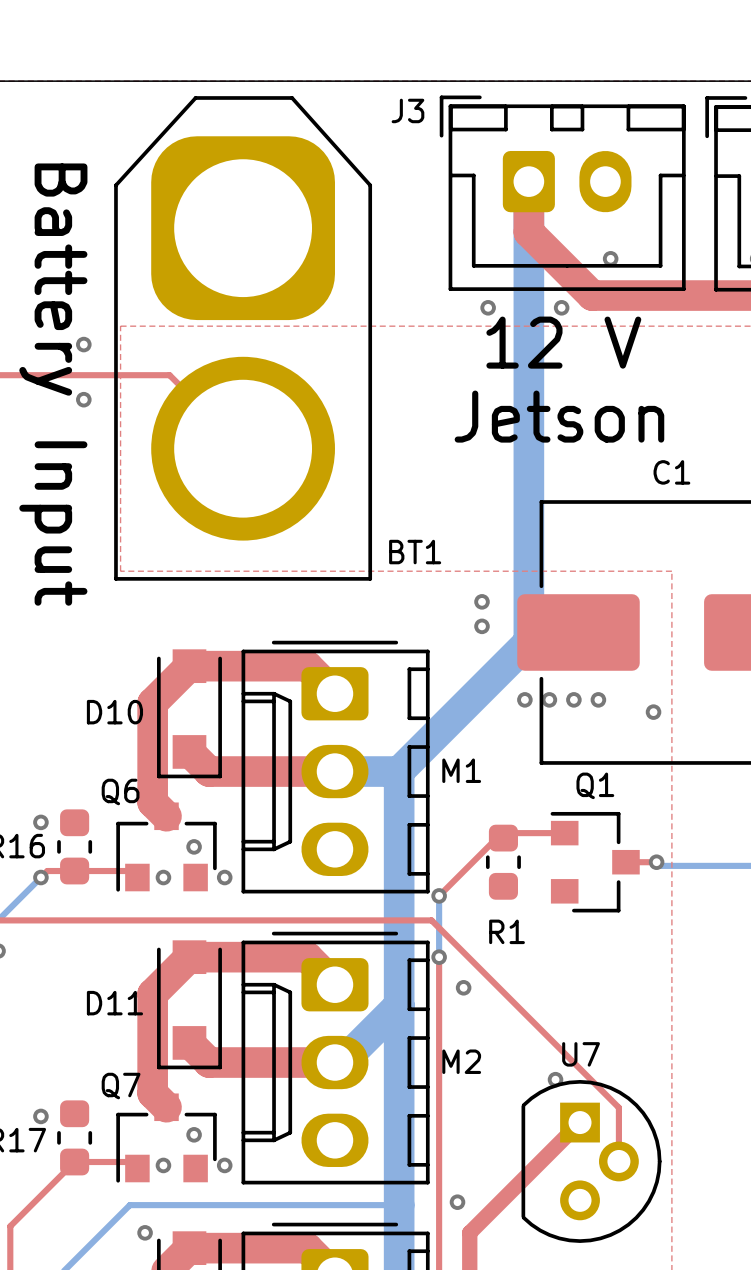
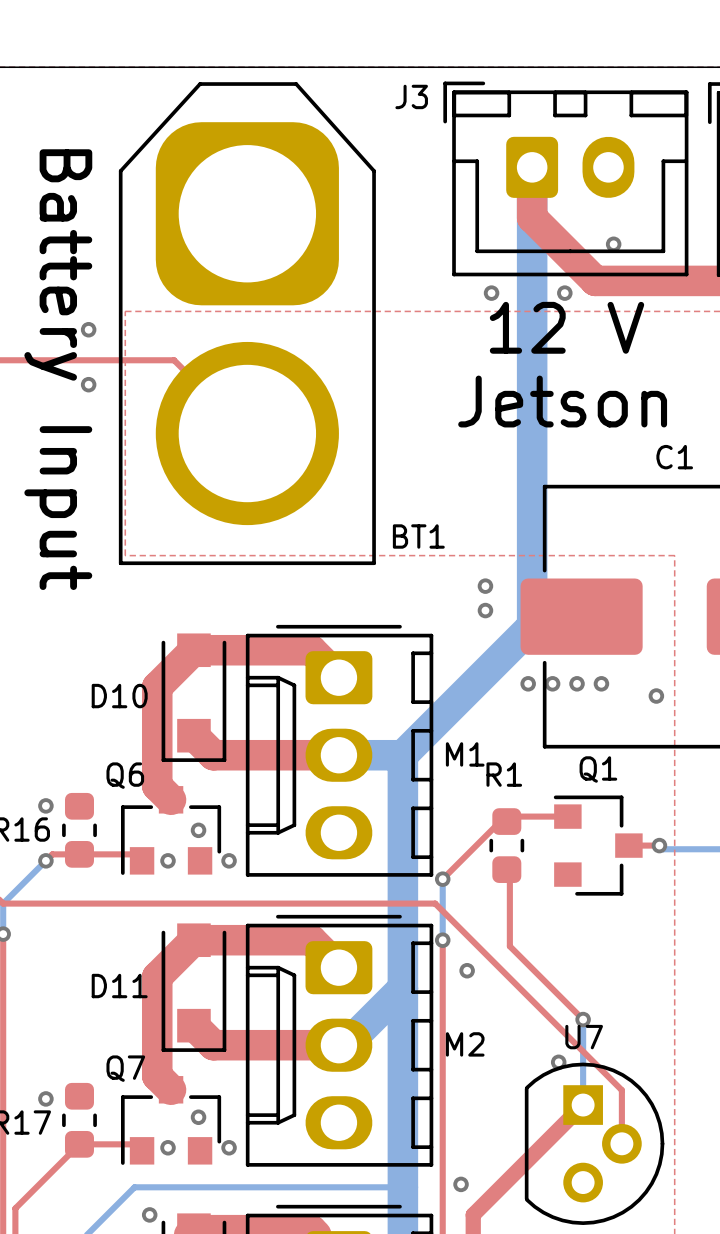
top track: none -> (509, 866) (509, 946) (583, 1019)
R1 name position: R1 (507, 931) -> R1 (504, 774)
bottom track: none -> (583, 1019) (583, 1105)
via: none -> (583, 1019)

